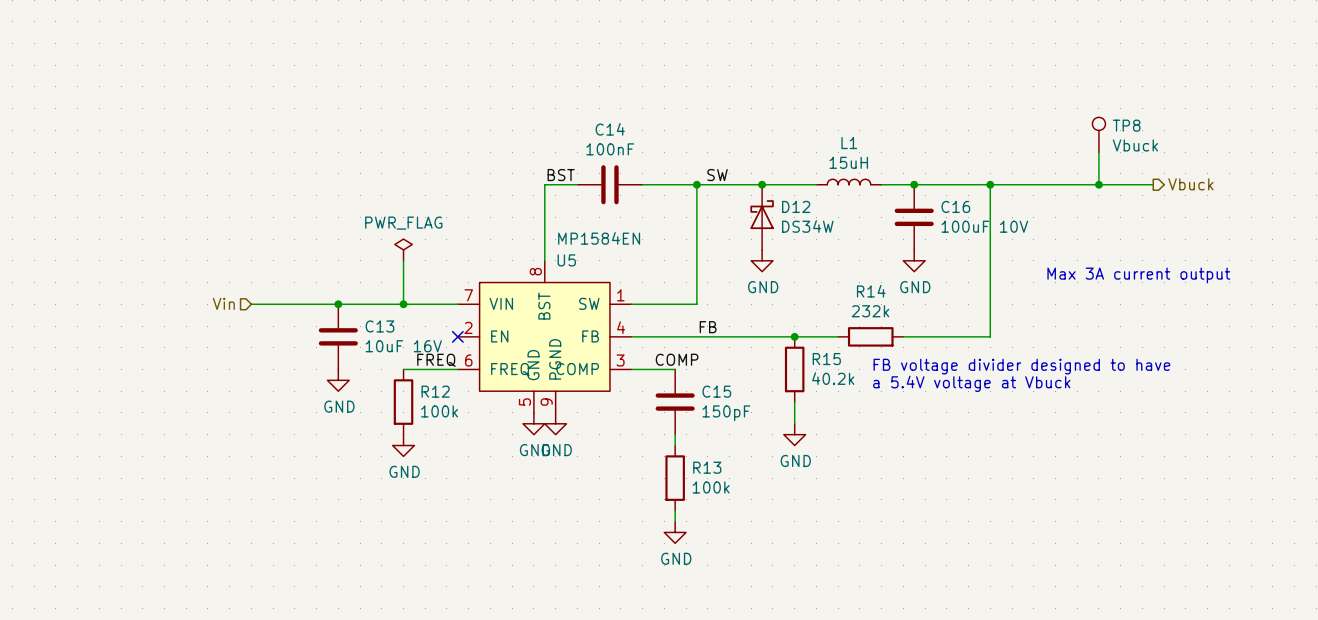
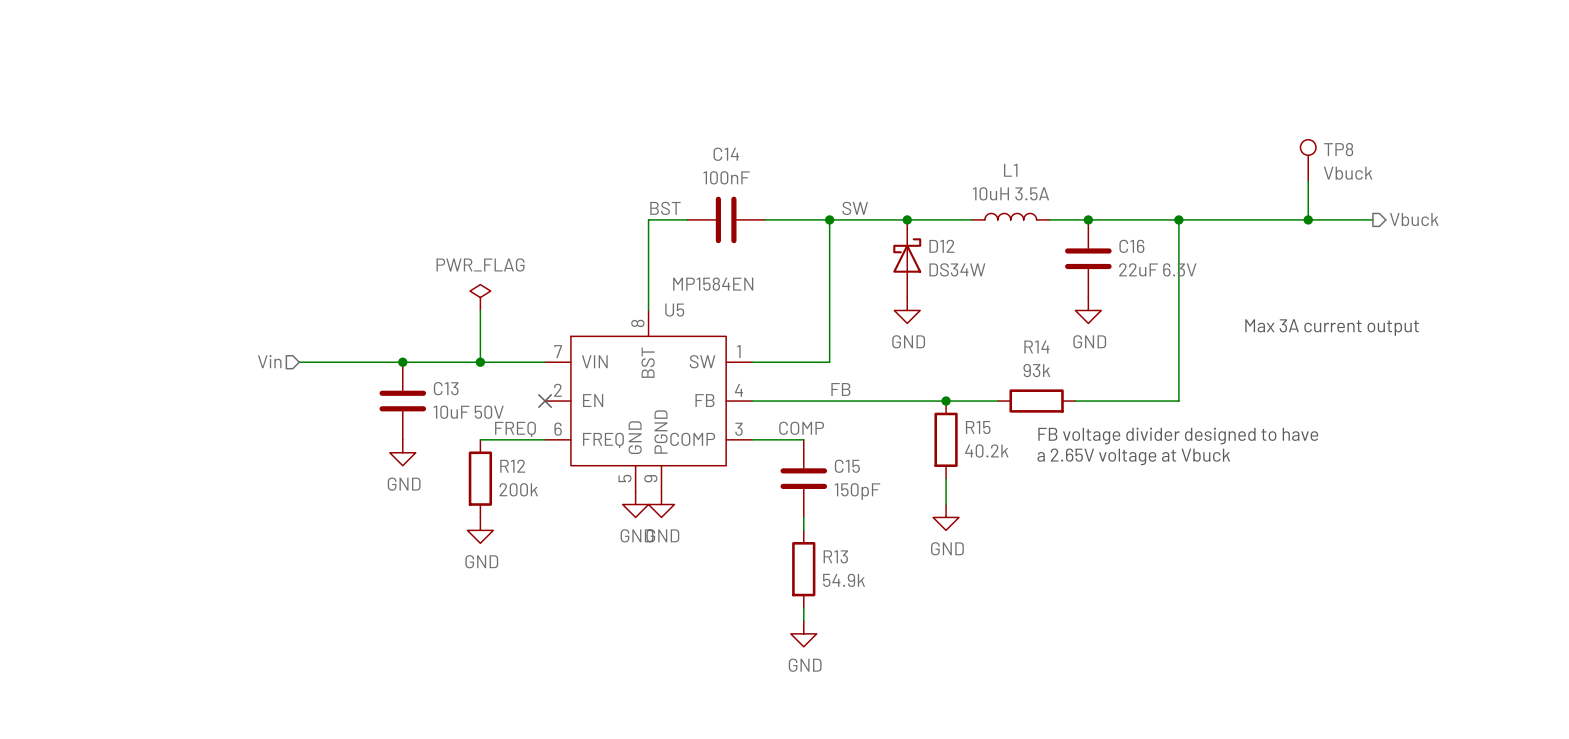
L1 value: 15uH (848, 162) -> 10uH 3.5A (1010, 193)
C16 value: 100uF 10V (984, 226) -> 22uF 6.3V (1157, 269)
R14 value: 232k (870, 311) -> 93k (1036, 370)
C13 value: 10uF 16V (403, 346) -> 10uF 50V (468, 412)
text: a 5.4V voltage at Vbuck (971, 383) -> a 2.65V voltage at Vbuck (1133, 456)
R12 value: 100k (439, 411) -> 200k (518, 489)
R13 value: 100k (711, 487) -> 54.9k (844, 580)

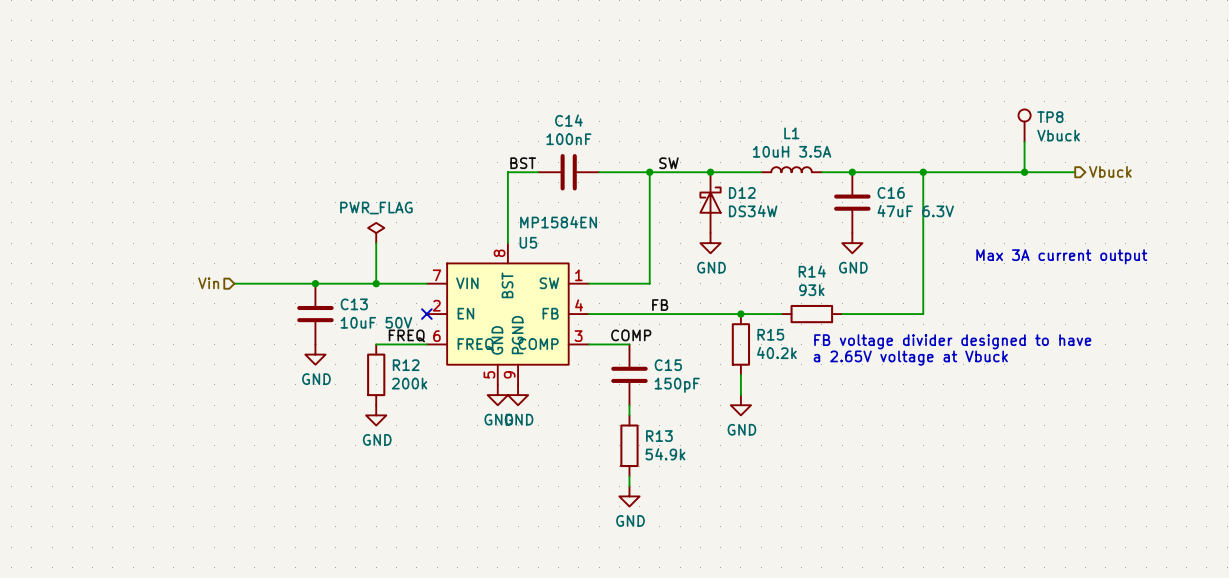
C16 value: 22uF 6.3V (1157, 269) -> 47uF 6.3V (915, 211)

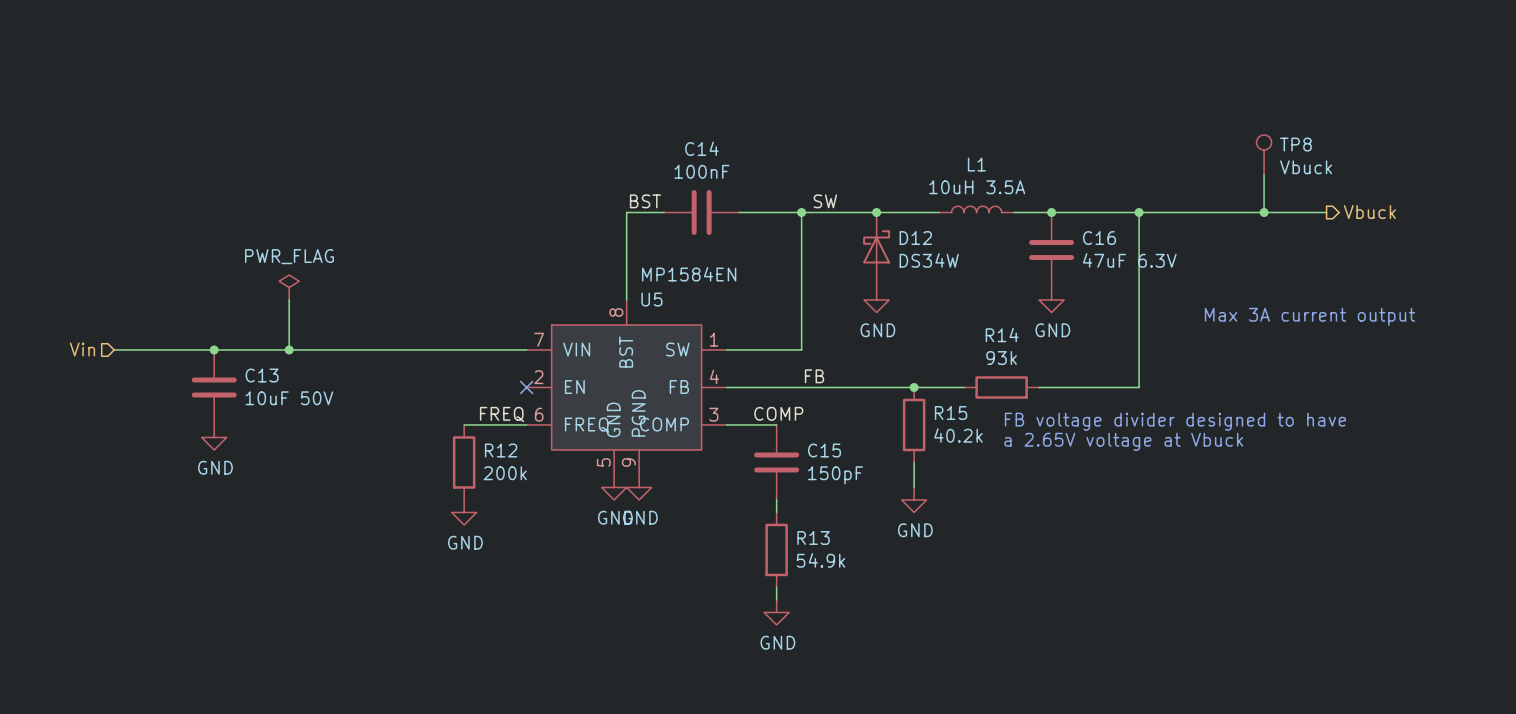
power symbol position: PWR_FLAG (376, 233) -> PWR_FLAG (289, 287)
wire: none -> (289, 300) (289, 349) (114, 349)
wire: (376, 243) (376, 283) -> none
junction: none -> (214, 349)
hierarchical label position: Vin (208, 283) -> Vin (82, 349)
junction: none -> (289, 349)
junction: (315, 283) -> none
junction: (376, 283) -> none
C13 position: (315, 314) -> (214, 387)
power symbol position: GND (315, 354) -> GND (214, 437)

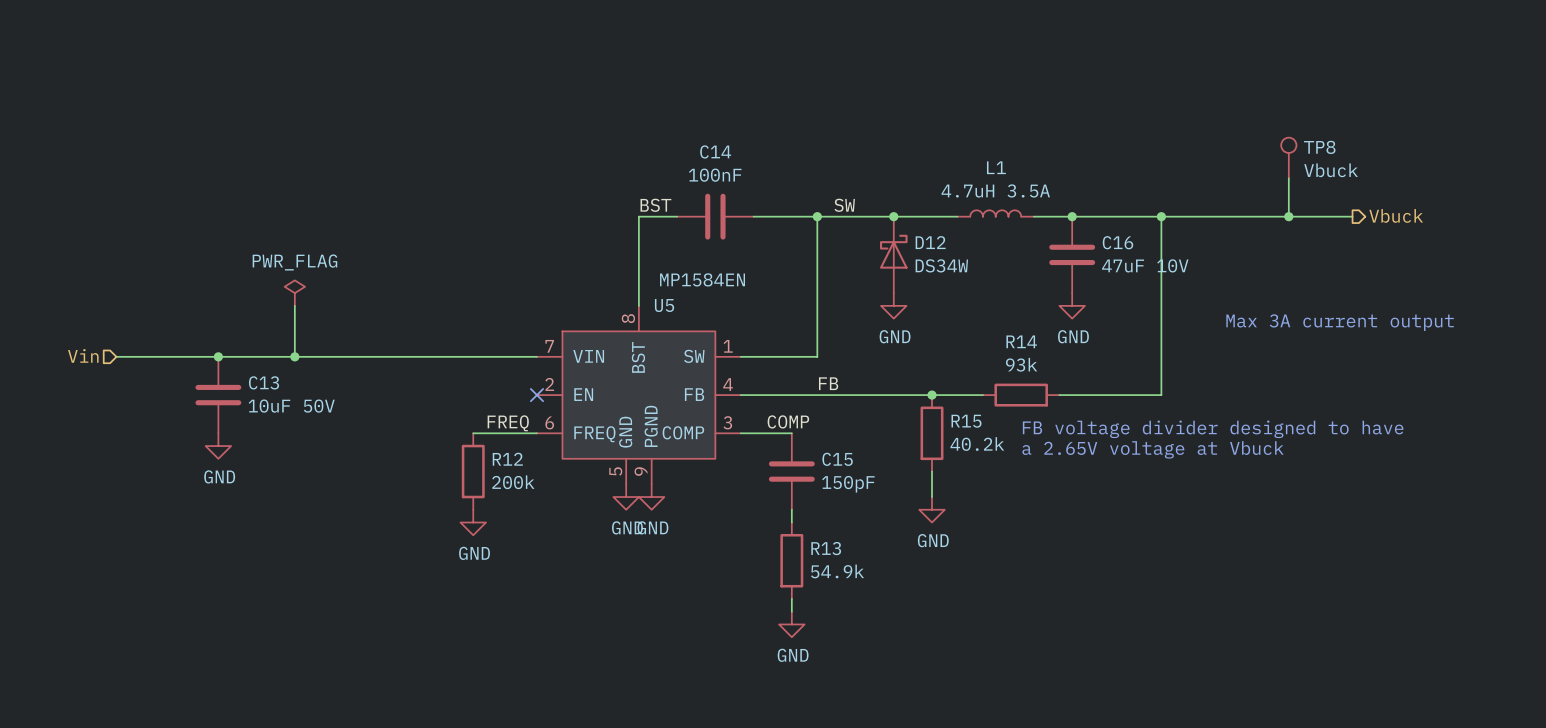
L1 value: 10uH 3.5A (977, 187) -> 4.7uH 3.5A (995, 190)
C16 value: 47uF 6.3V (1129, 260) -> 47uF 10V (1145, 265)

